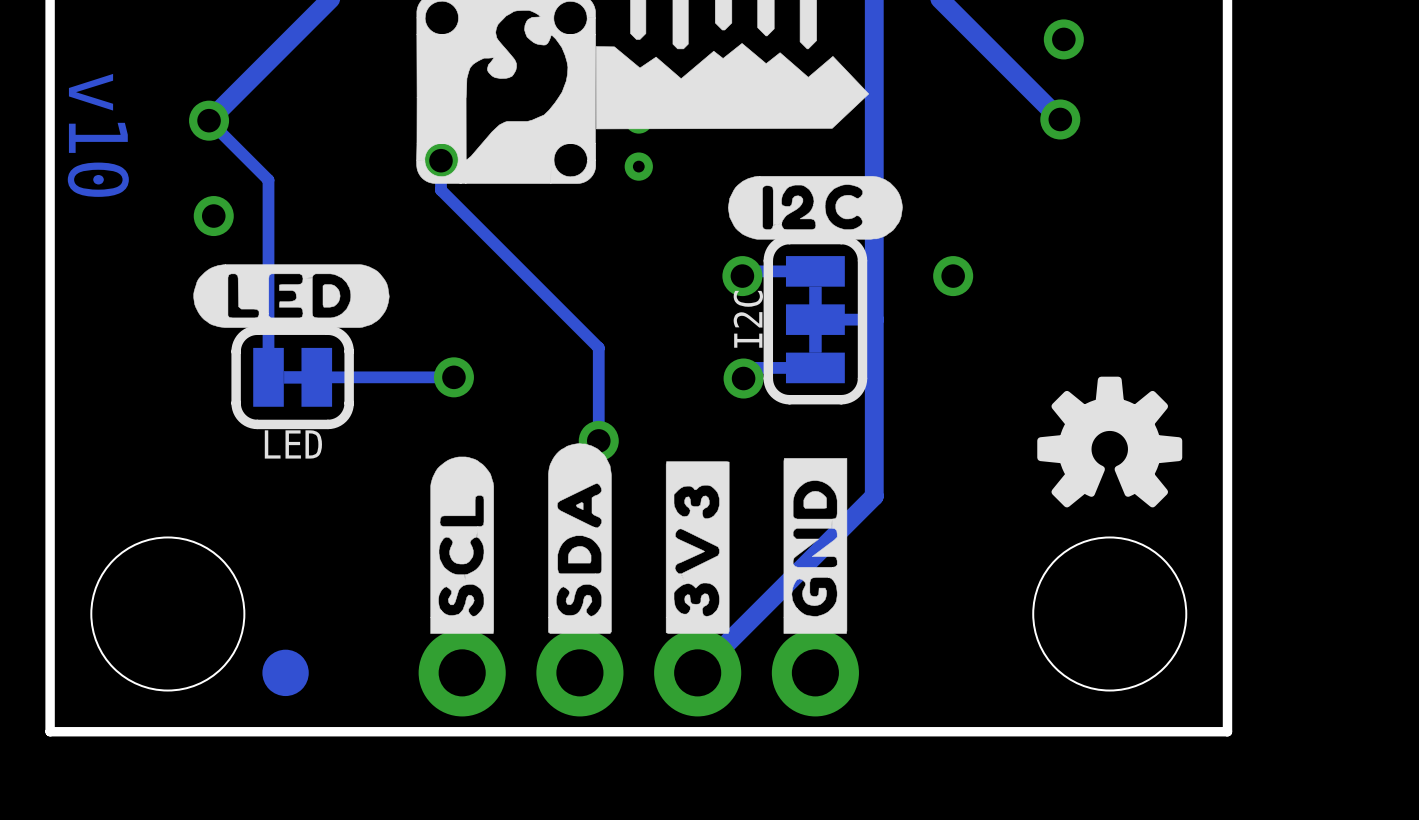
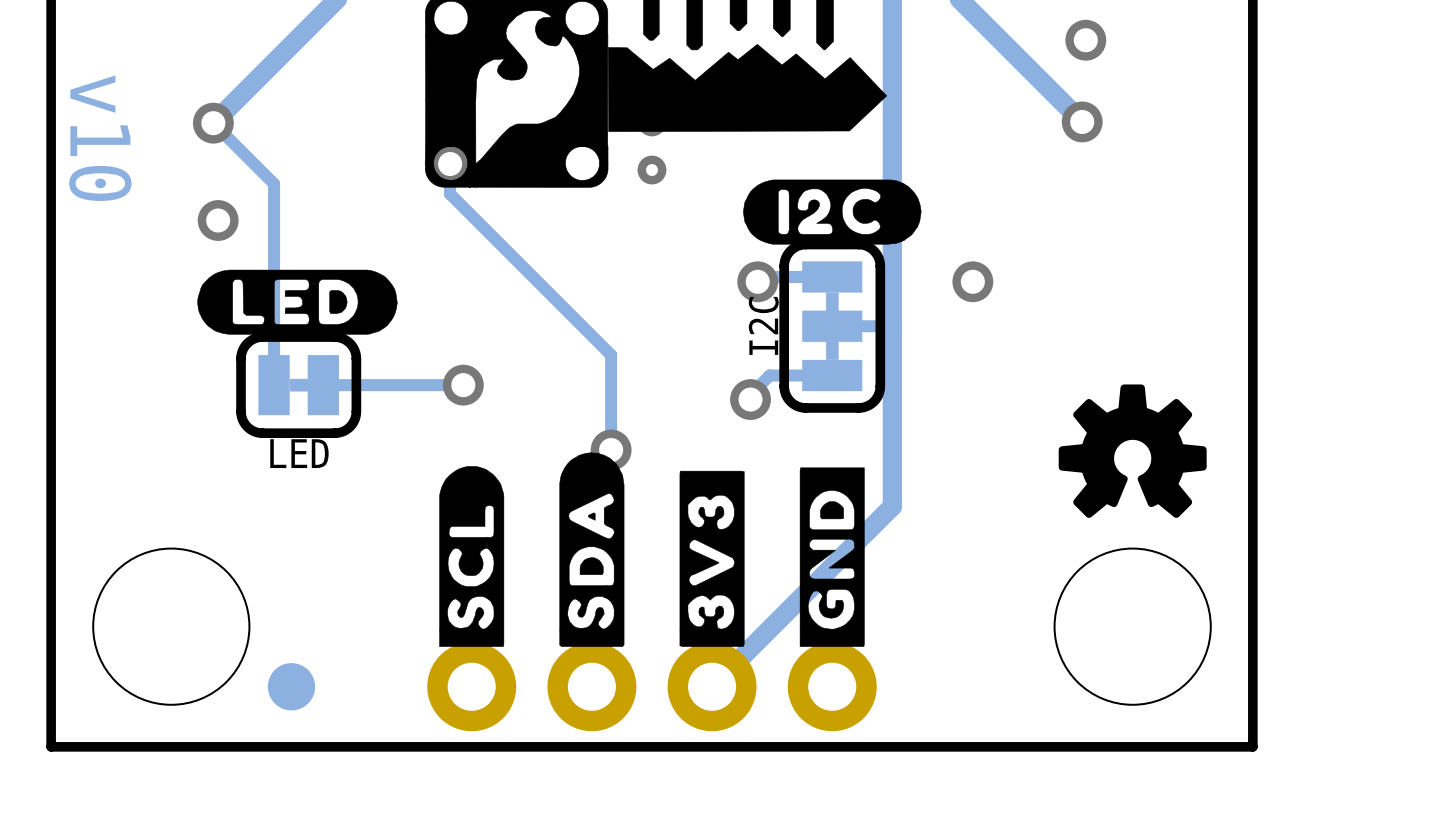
via position: (743, 378) -> (750, 399)

